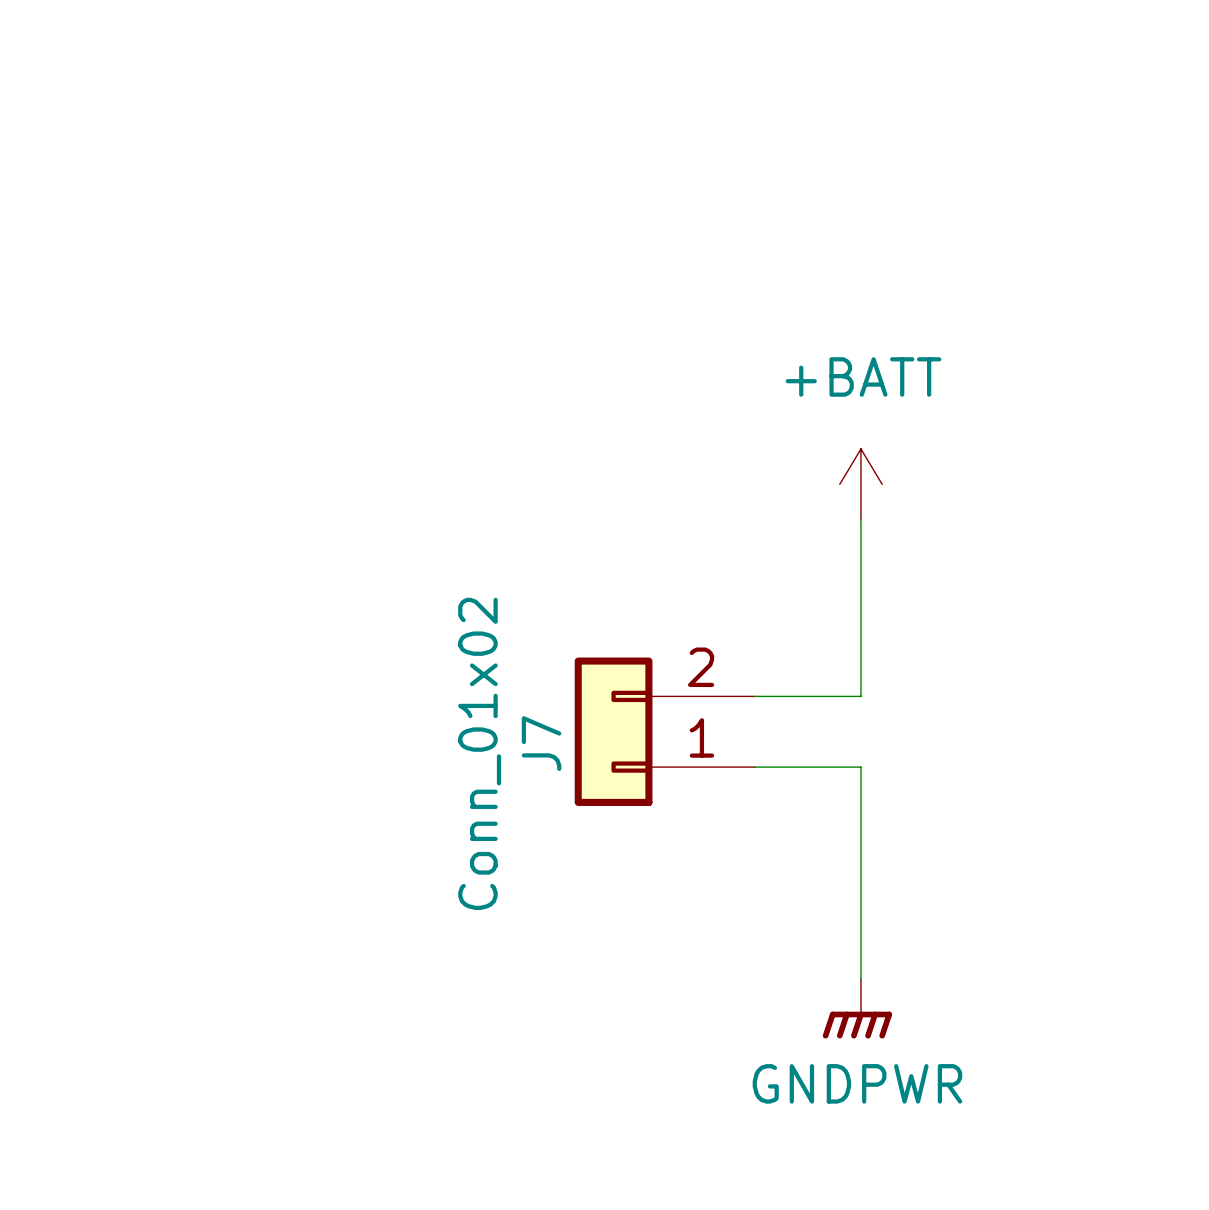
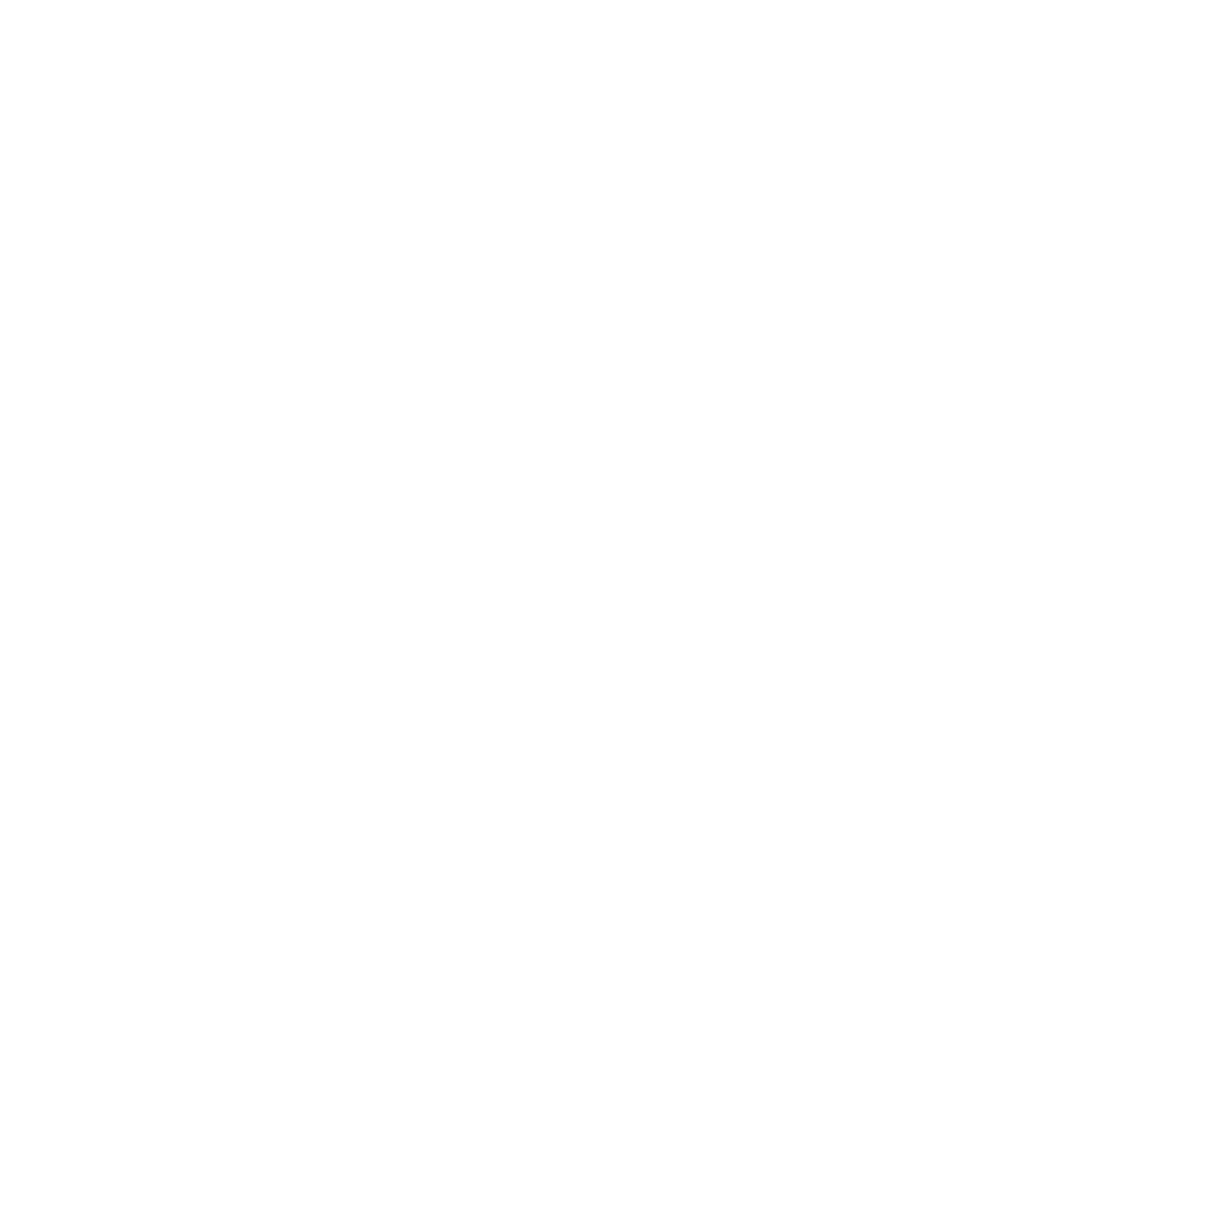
power symbol: +BATT (860, 484) -> none
wire: (860, 519) (860, 696) (754, 696) -> none
J7: Conn_01x02 (664, 731) -> none
wire: (754, 767) (860, 767) (860, 979) -> none
power symbol: GNDPWR (857, 1008) -> none

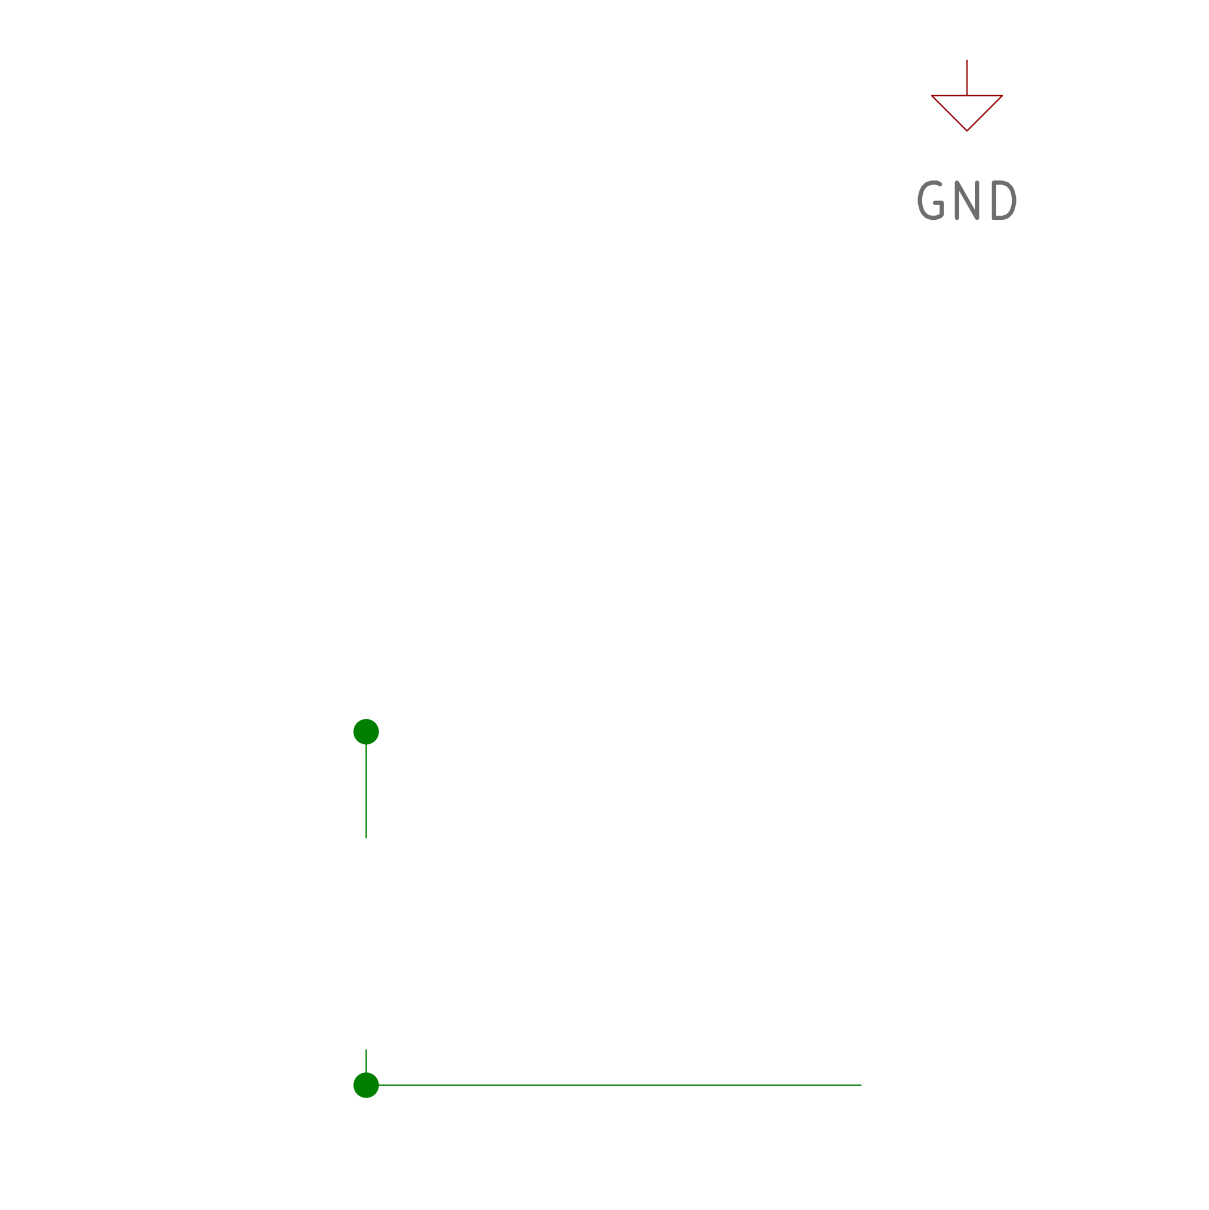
power symbol: none -> GND (967, 95)
wire: none -> (366, 731) (366, 837)
junction: none -> (366, 731)
wire: none -> (366, 1049) (366, 1085) (860, 1085)
junction: none -> (366, 1085)

